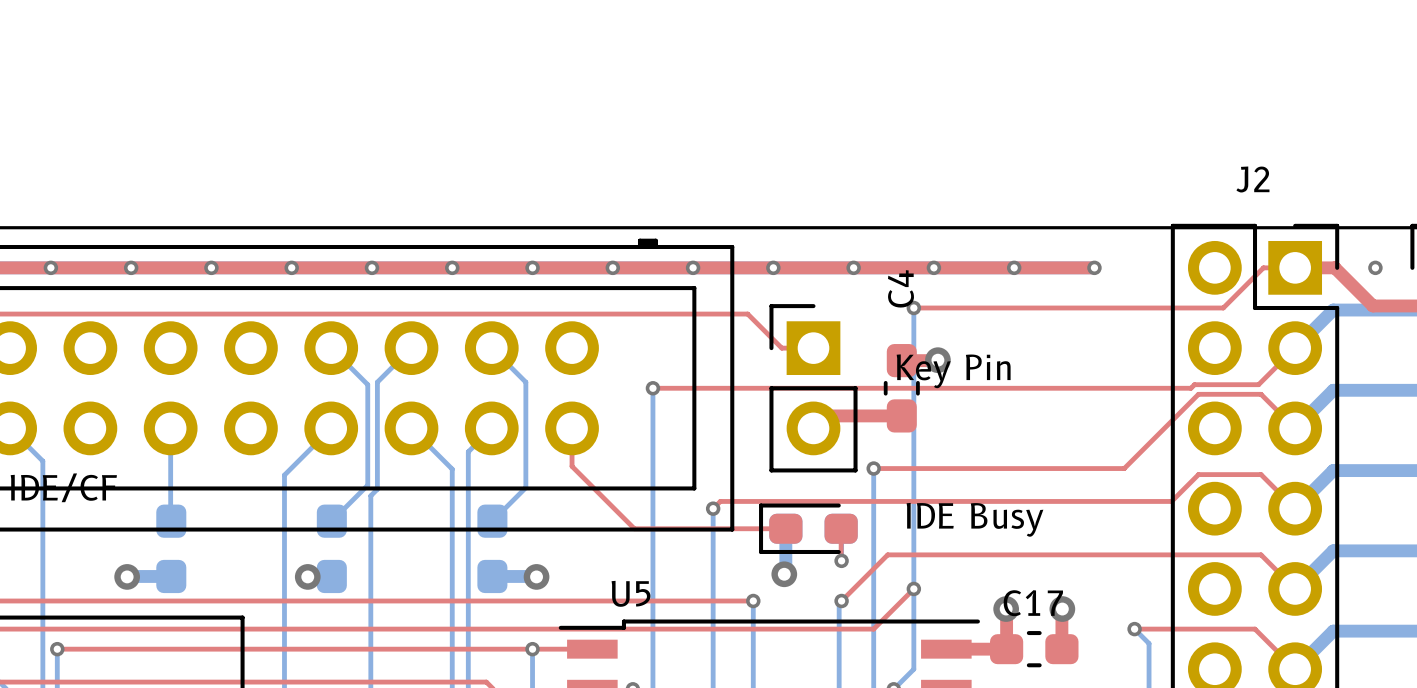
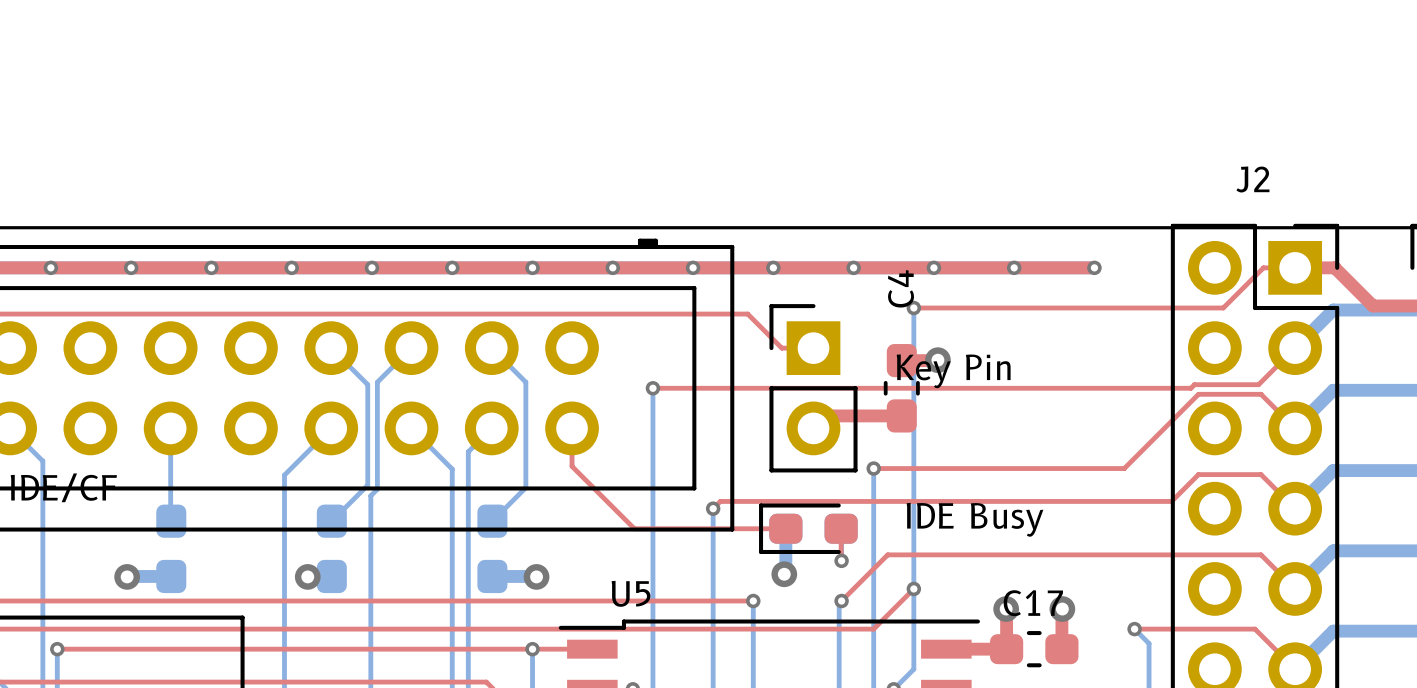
via: (1375, 267) -> none

